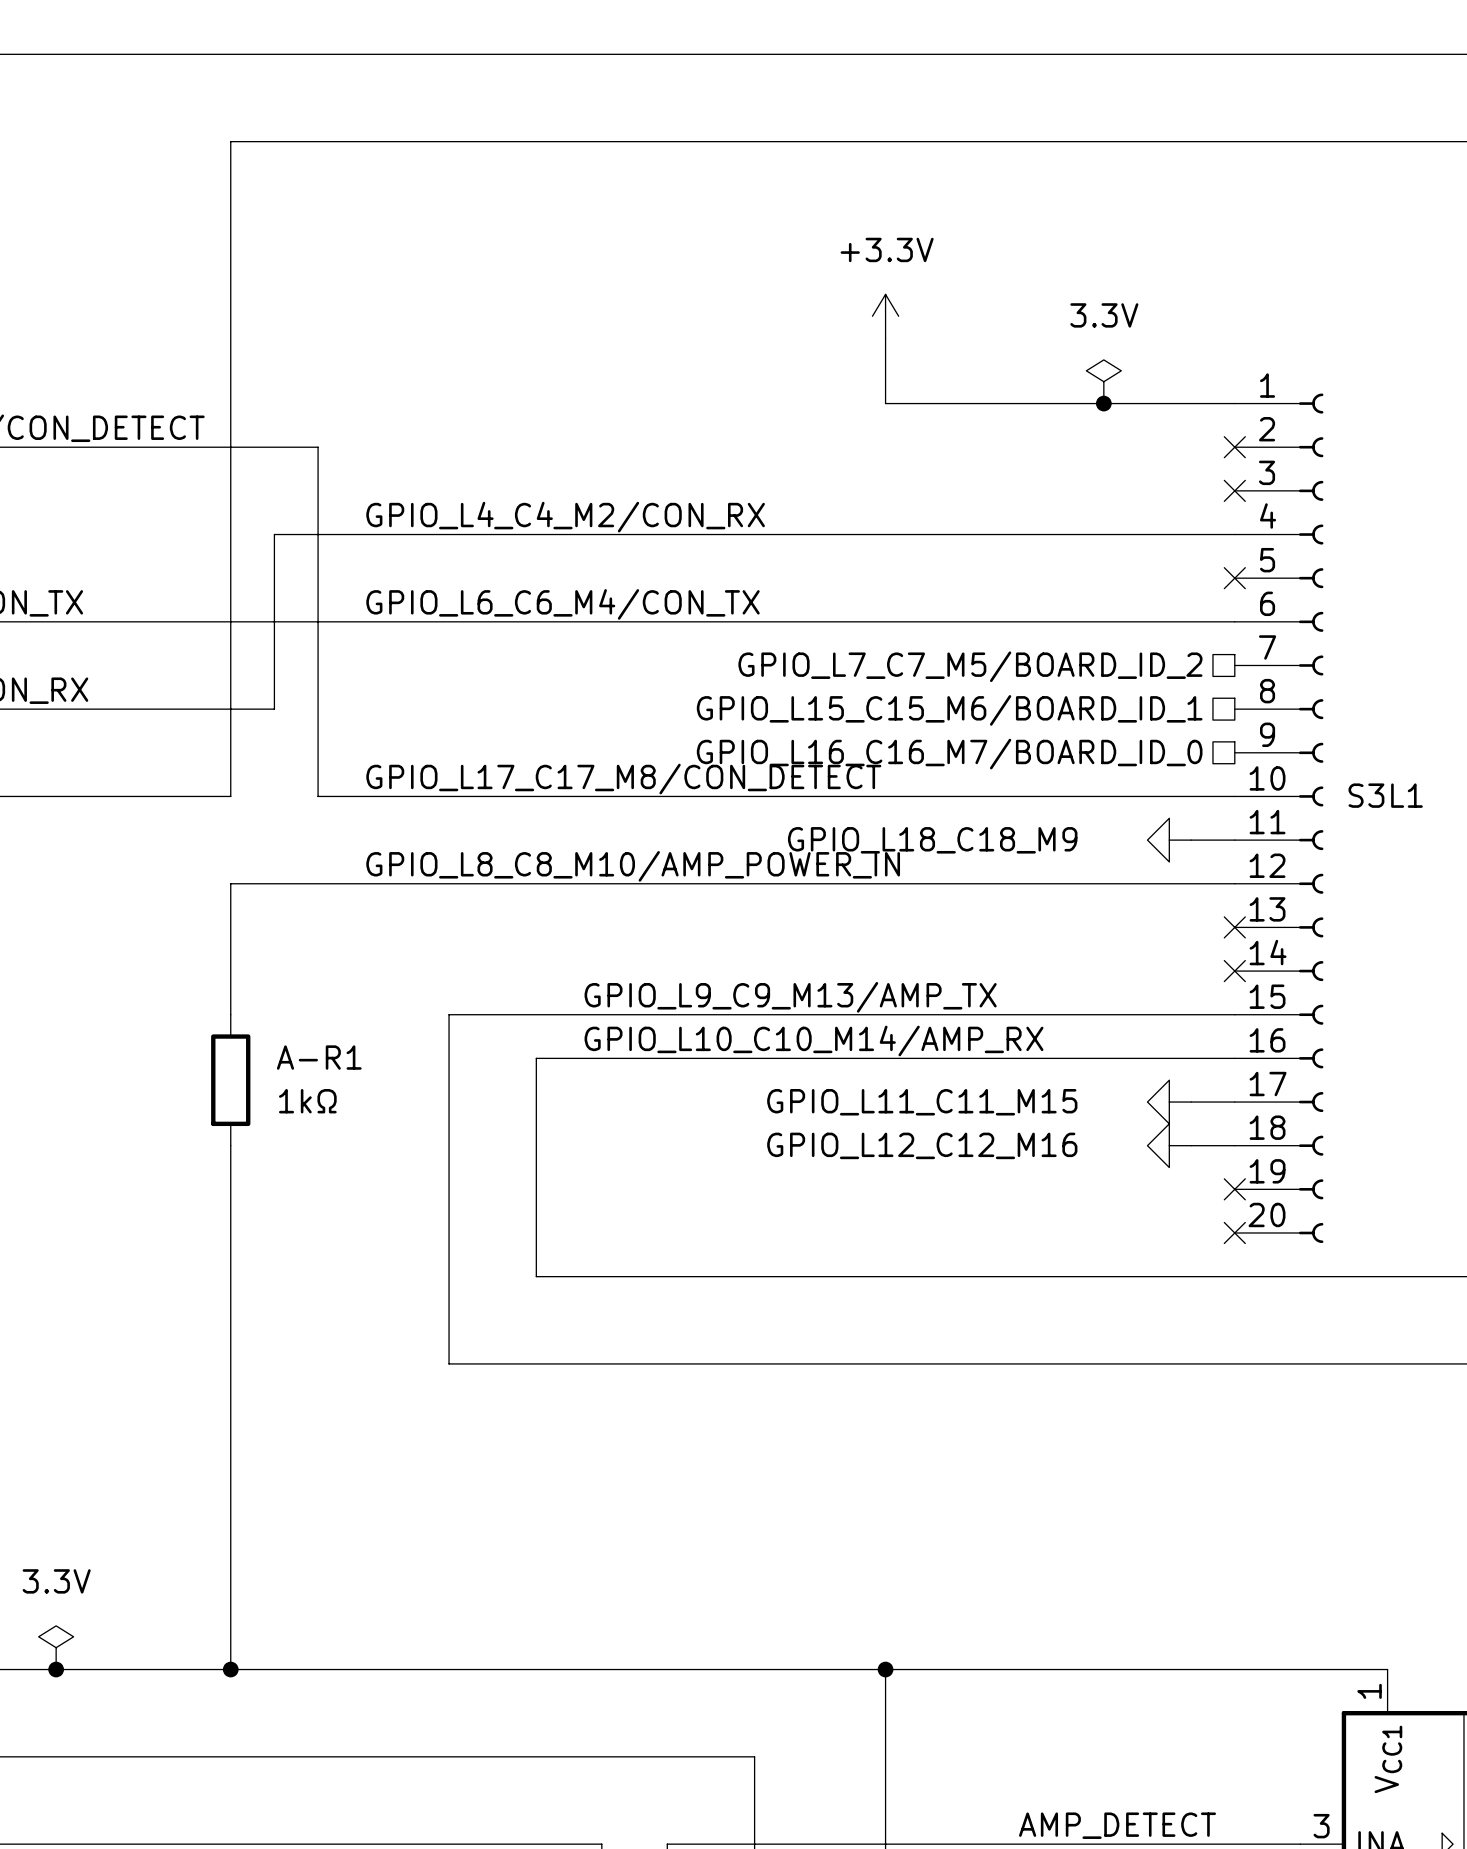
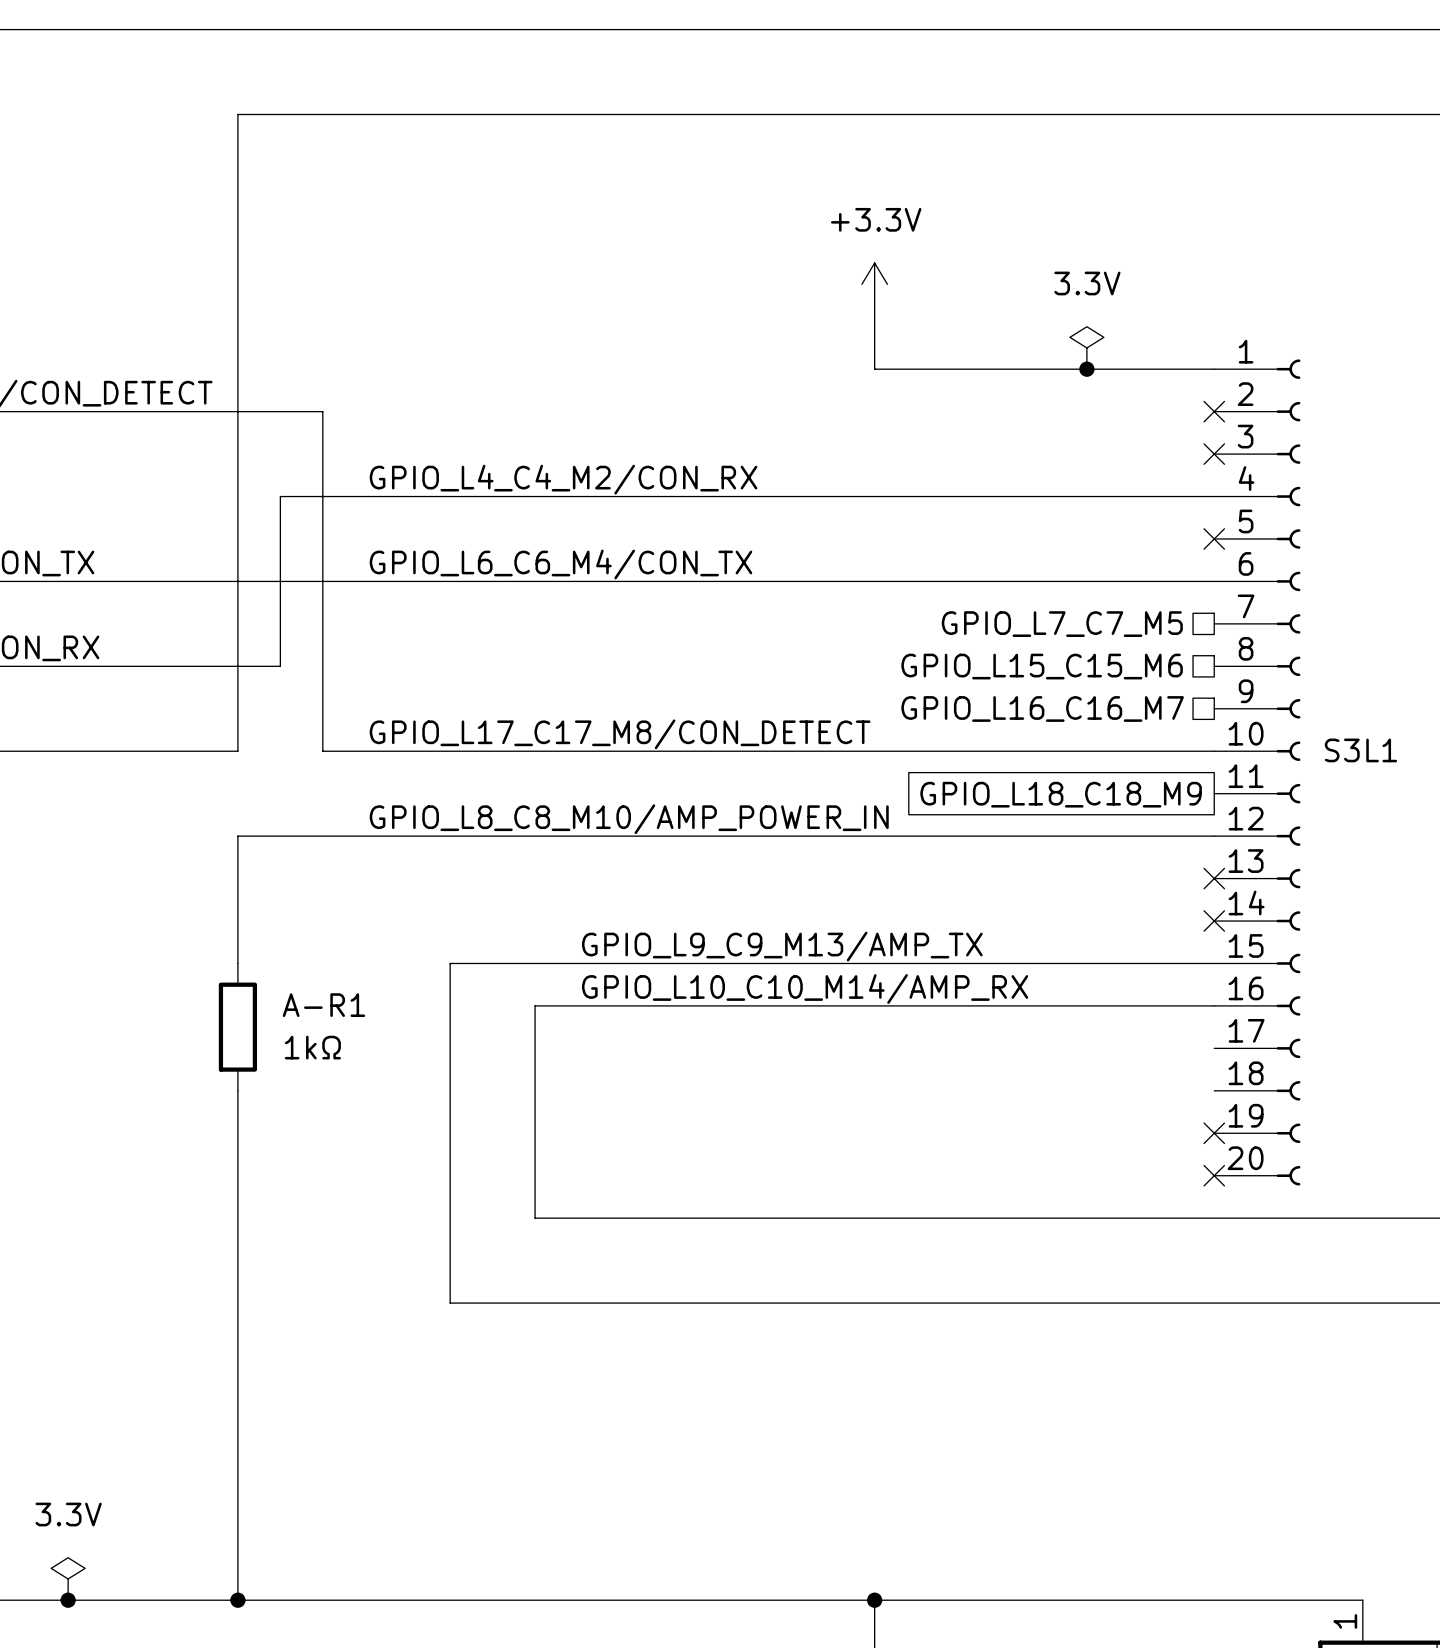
hierarchical label: GPIO_L7_C7_M5/BOARD_ID_2 (970, 666) -> GPIO_L7_C7_M5 (1062, 624)
hierarchical label: GPIO_L15_C15_M6/BOARD_ID_1 (949, 710) -> GPIO_L15_C15_M6 (1042, 666)
hierarchical label: GPIO_L16_C16_M7/BOARD_ID_0 (949, 754) -> GPIO_L16_C16_M7 (1042, 708)
GPIO_L18_C18_M9: (1169, 840) -> none
wire: (1191, 840) (1234, 840) -> none
global label: none -> GPIO_L18_C18_M9 (1061, 794)
GPIO_L11_C11_M15: (1169, 1102) -> none
wire: (1191, 1102) (1234, 1102) -> none
GPIO_L12_C12_M16: (1169, 1145) -> none
wire: (1191, 1145) (1234, 1145) -> none

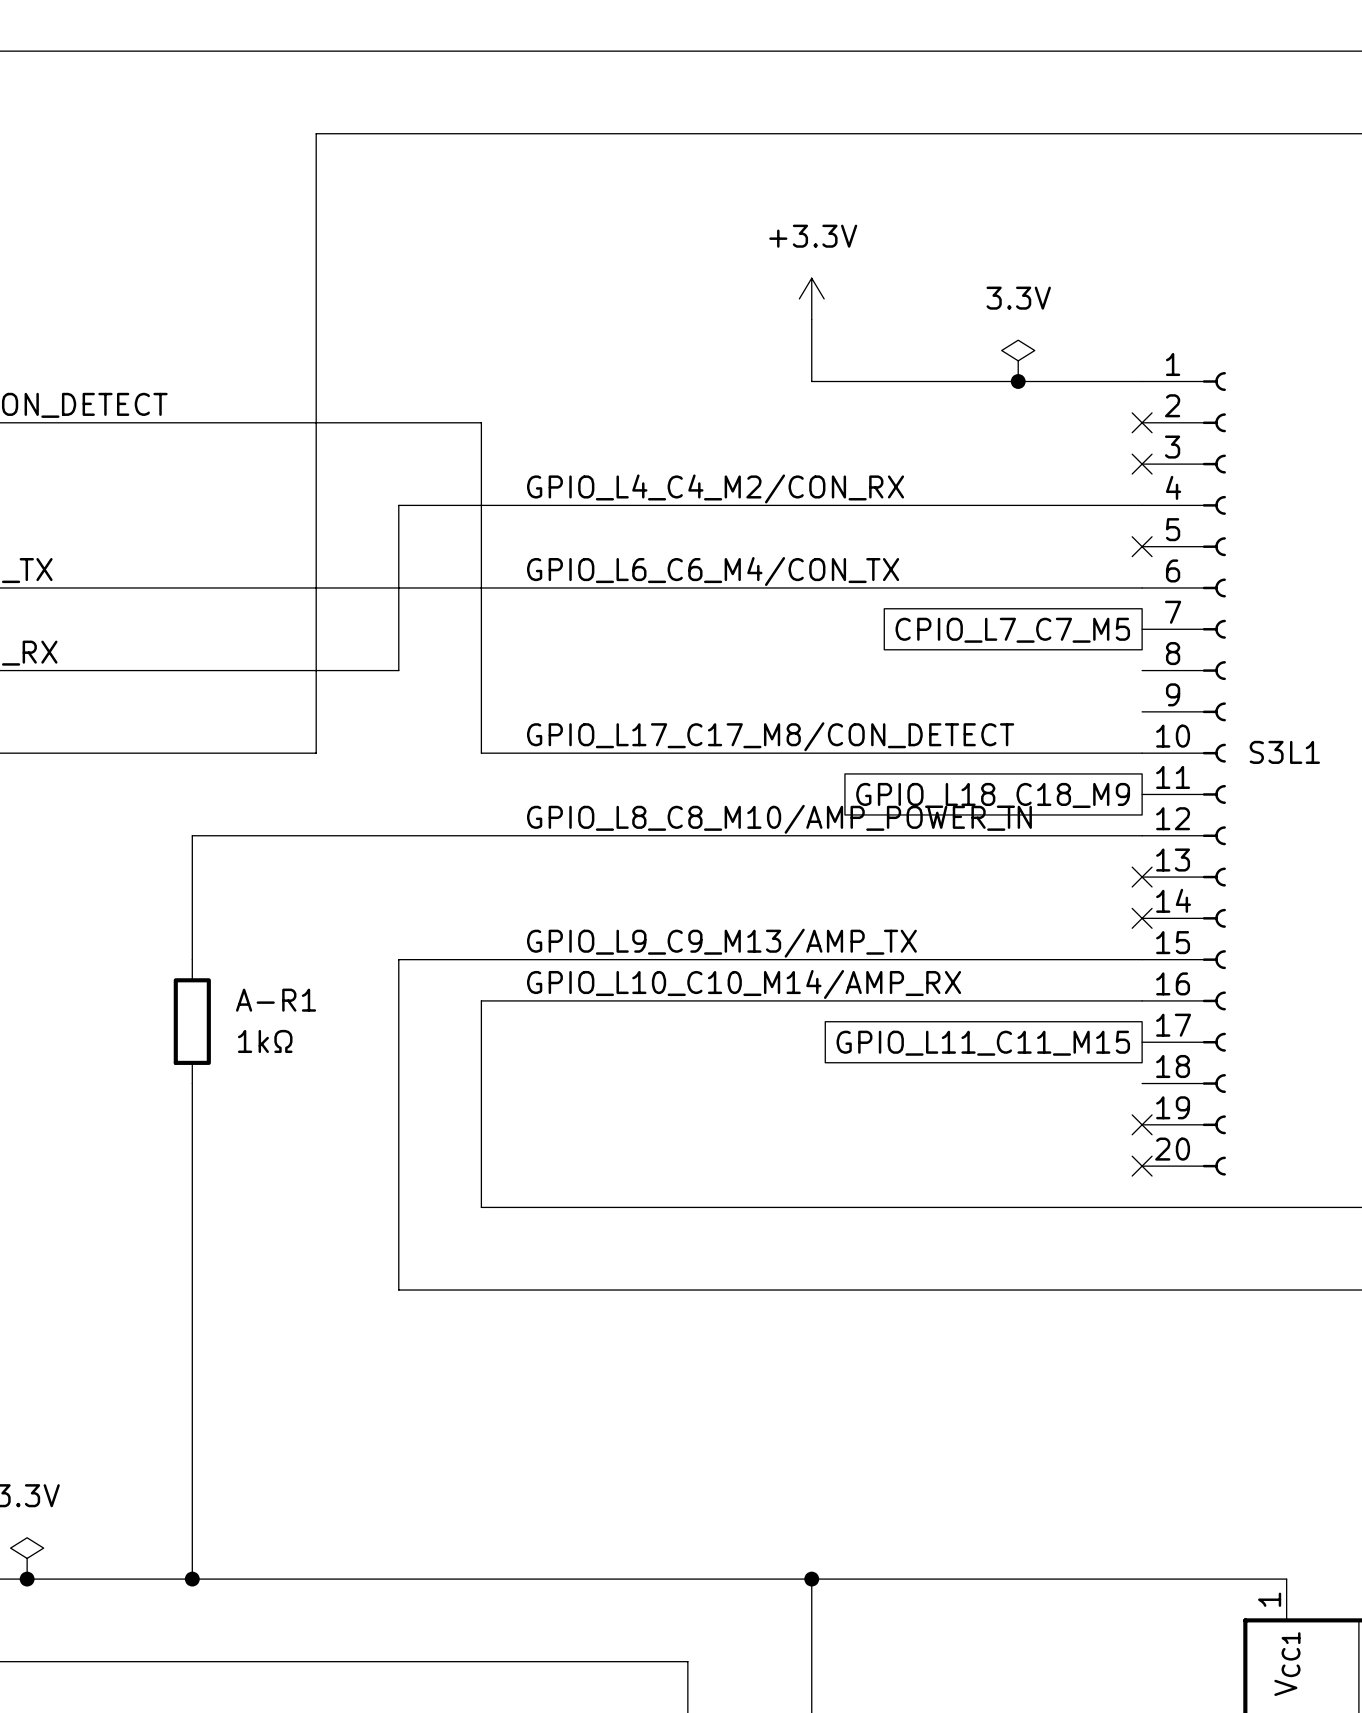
wire: (365, 114) (237, 114) (237, 751) -> (316, 133) (316, 753)
wire: (322, 411) (322, 751) -> (274, 422) (481, 422) (481, 753)
label position: GPIO_L4_C4_M2/CON_RX (563, 479) -> GPIO_L4_C4_M2/CON_RX (715, 488)
wire: (450, 496) (280, 496) (280, 666) -> (398, 505) (398, 670) (233, 670)
label position: GPIO_L6_C6_M4/CON_TX (560, 564) -> GPIO_L6_C6_M4/CON_TX (713, 571)
hierarchical label: GPIO_L7_C7_M5 (1062, 624) -> none
global label: none -> CPIO_L7_C7_M5 (1012, 630)
hierarchical label: GPIO_L15_C15_M6 (1042, 666) -> none
hierarchical label: GPIO_L16_C16_M7 (1042, 708) -> none
label position: GPIO_L17_C17_M8/CON_DETECT (620, 734) -> GPIO_L17_C17_M8/CON_DETECT (770, 736)
wire: none -> (192, 753) (274, 753)
wire: (365, 751) (535, 751) -> none
label position: GPIO_L8_C8_M10/AMP_POWER_IN (629, 819) -> GPIO_L8_C8_M10/AMP_POWER_IN (779, 819)
global label: none -> GPIO_L11_C11_M15 (983, 1043)

